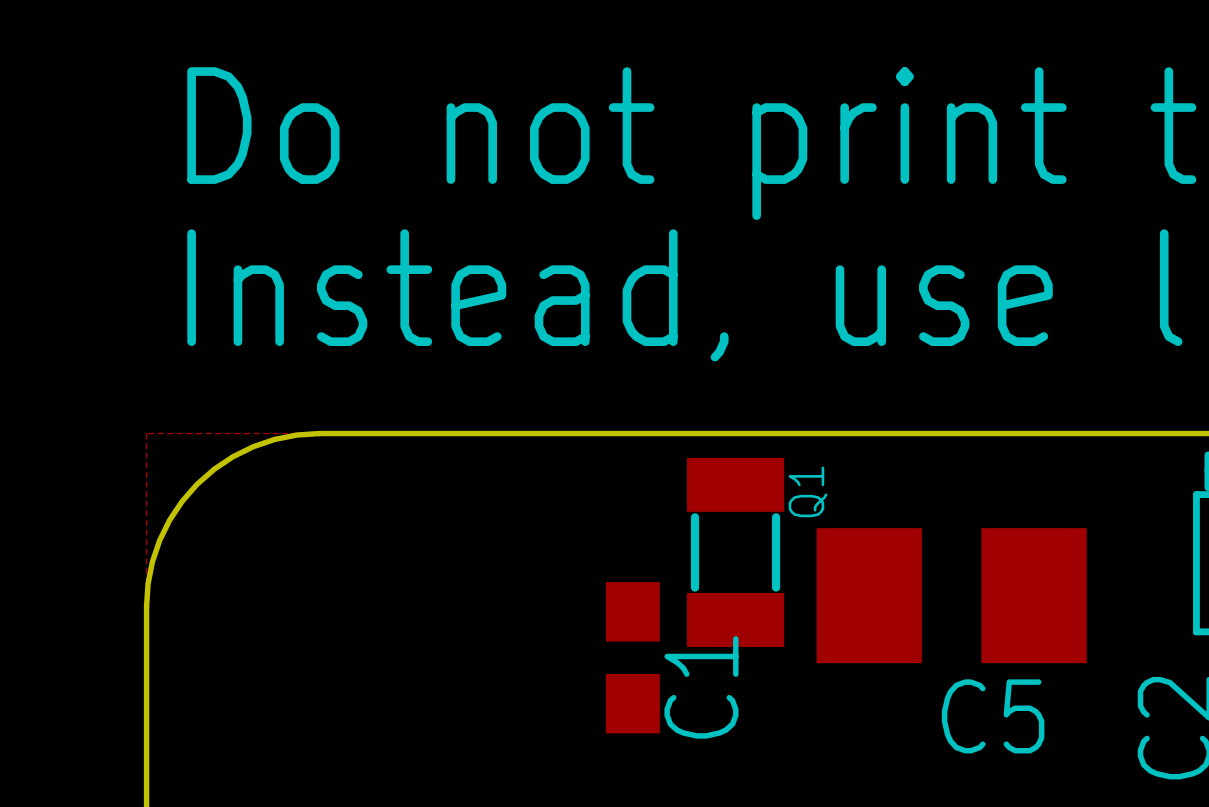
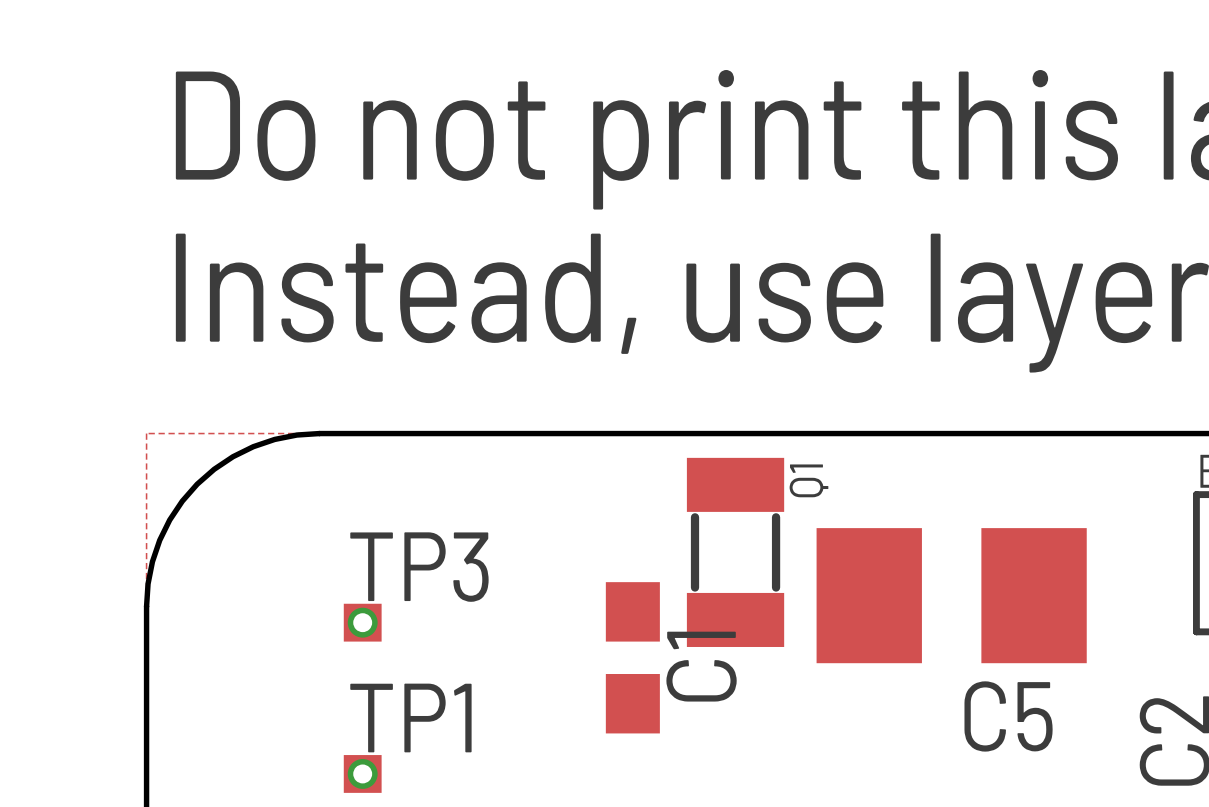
TP3: none -> (362, 622)
via: none -> (362, 622)
TP1: none -> (362, 773)
via: none -> (362, 773)

